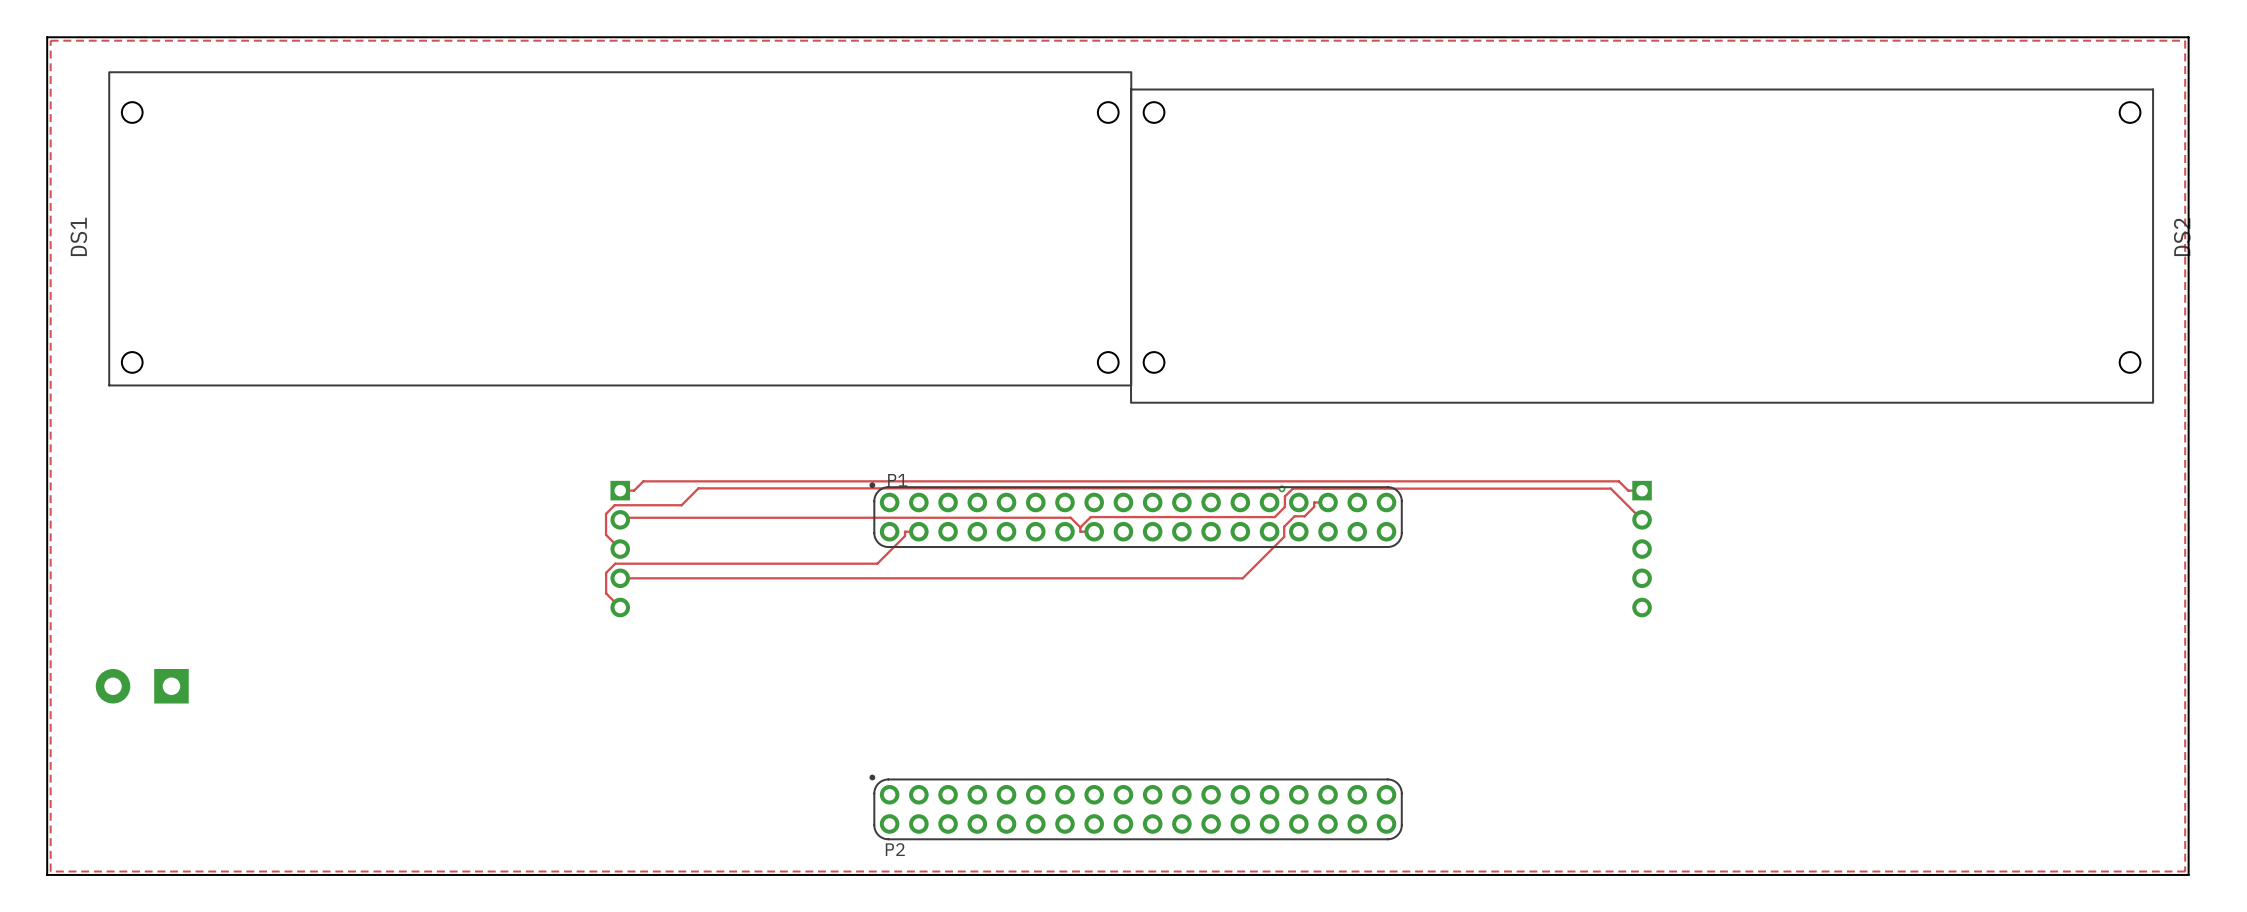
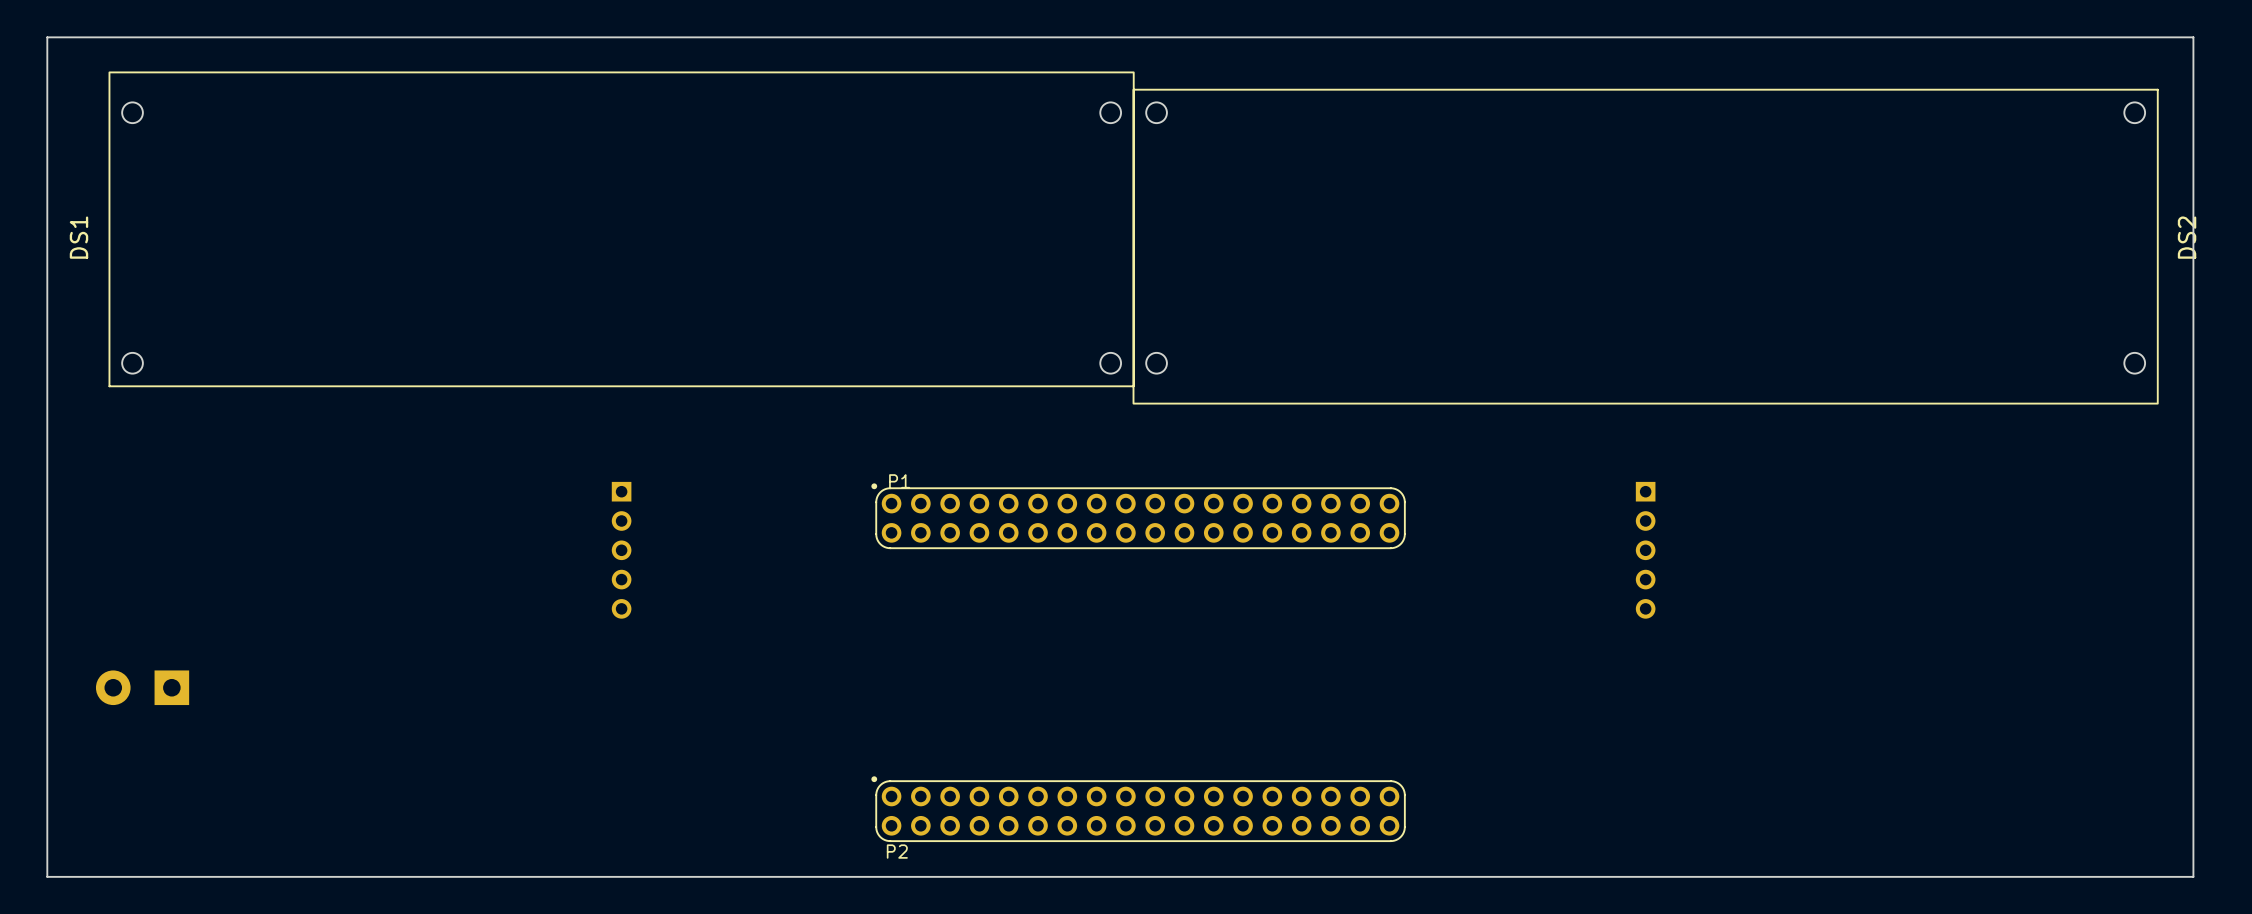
zone outline: (50, 40) (2185, 40) (2185, 871) (50, 871) (50, 40) -> none
track: (1281, 488) (698, 488) (681, 505) (614, 505) (606, 513) (606, 534) (620, 549) -> none
via: (1281, 488) -> none
track: (620, 490) (634, 490) (643, 481) (1618, 481) (1628, 490) (1642, 490) -> none
track: (1328, 502) (1314, 502) (1314, 506) (1304, 516) (1294, 516) (1284, 526) (1284, 536) (1242, 578) (620, 578) -> none
track: (620, 519) (622, 517) (1070, 517) (1080, 527) -> none
track: (1642, 519) (1610, 488) (1292, 488) (1284, 496) (1284, 506) (1274, 517) (1090, 517) (1080, 527) -> none
track: (1080, 527) (1080, 531) (1094, 531) -> none
track: (918, 531) (905, 531) (905, 536) (877, 563) (615, 563) (606, 572) (606, 593) (620, 607) -> none

